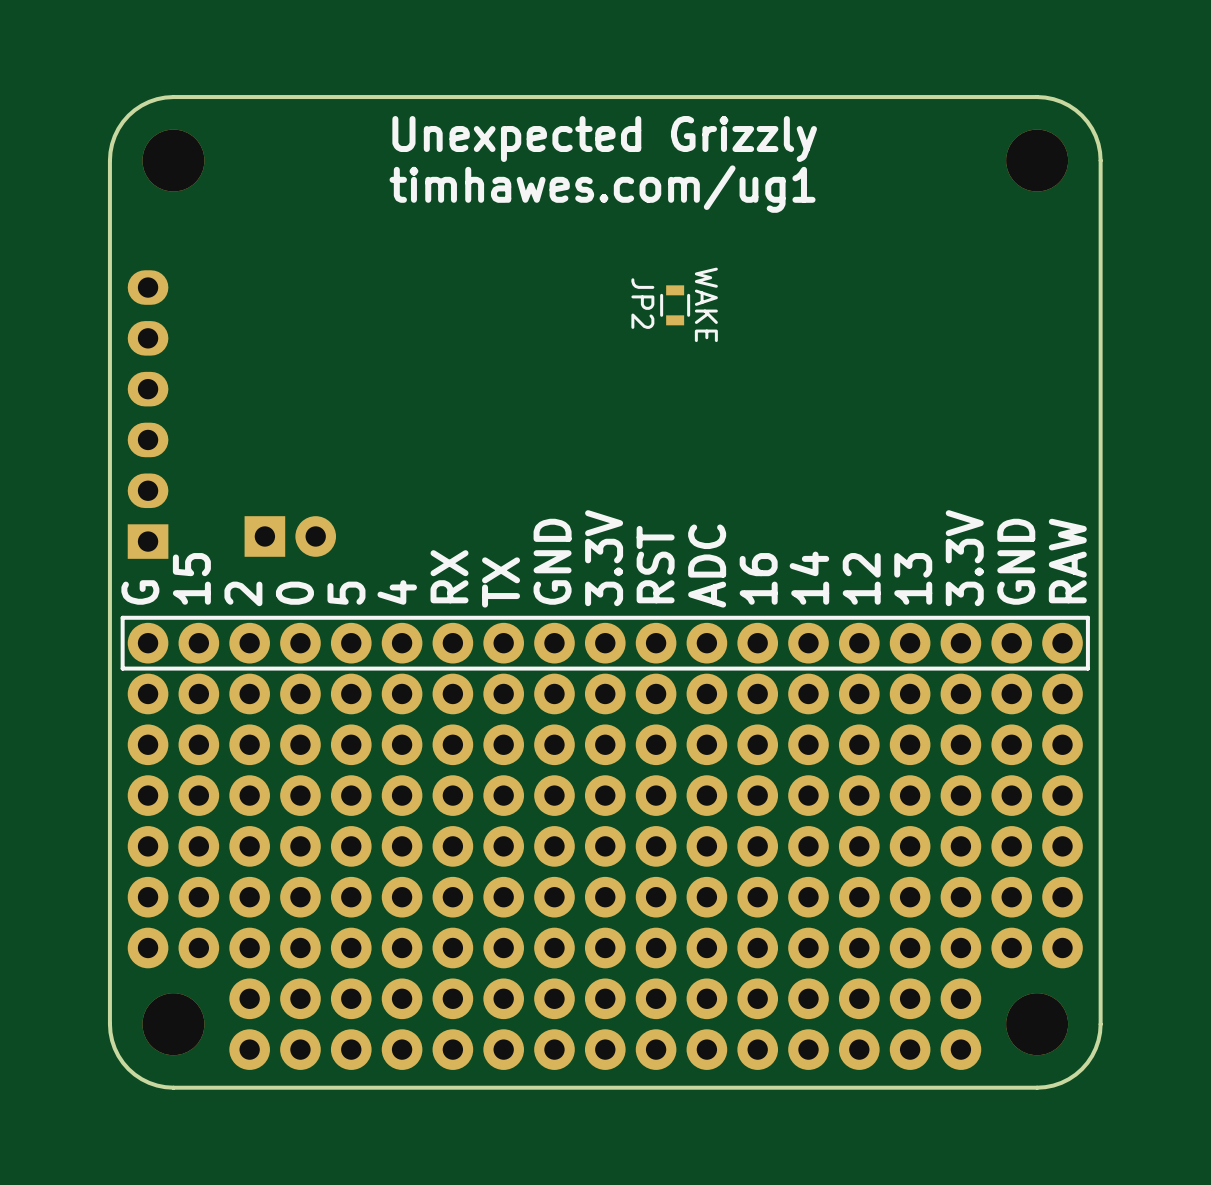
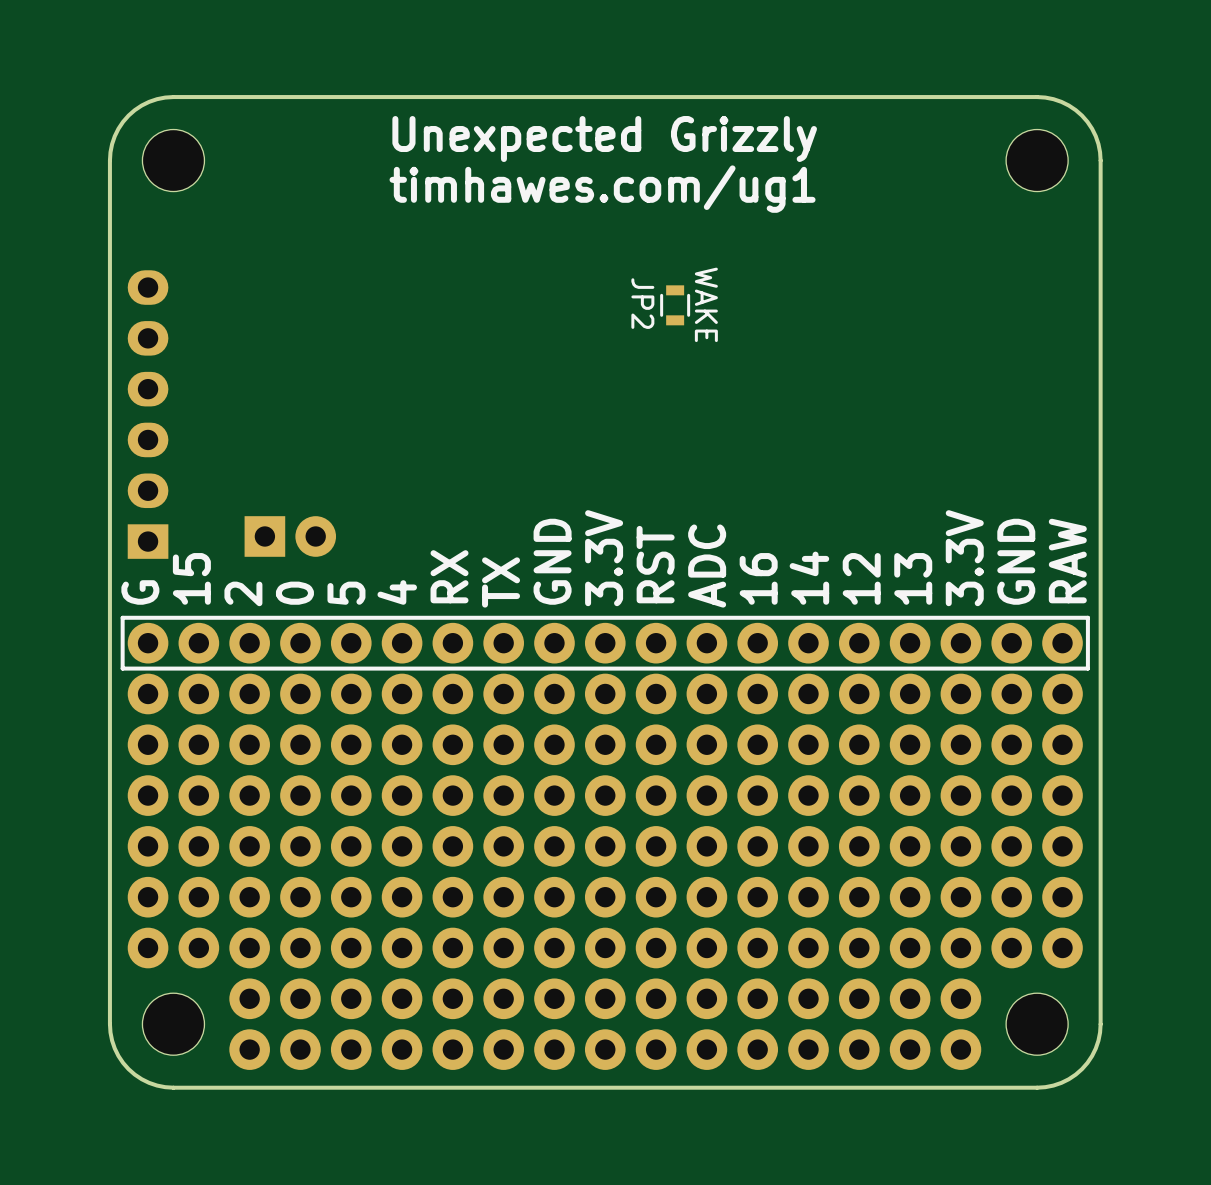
part footprint: [142, 129, 205, 192] -> [142, 129, 205, 192]
part footprint: [1006, 129, 1069, 192] -> [1006, 129, 1069, 192]
part footprint: [142, 993, 205, 1056] -> [142, 993, 205, 1056]
part footprint: [1006, 993, 1069, 1056] -> [1006, 993, 1069, 1056]

